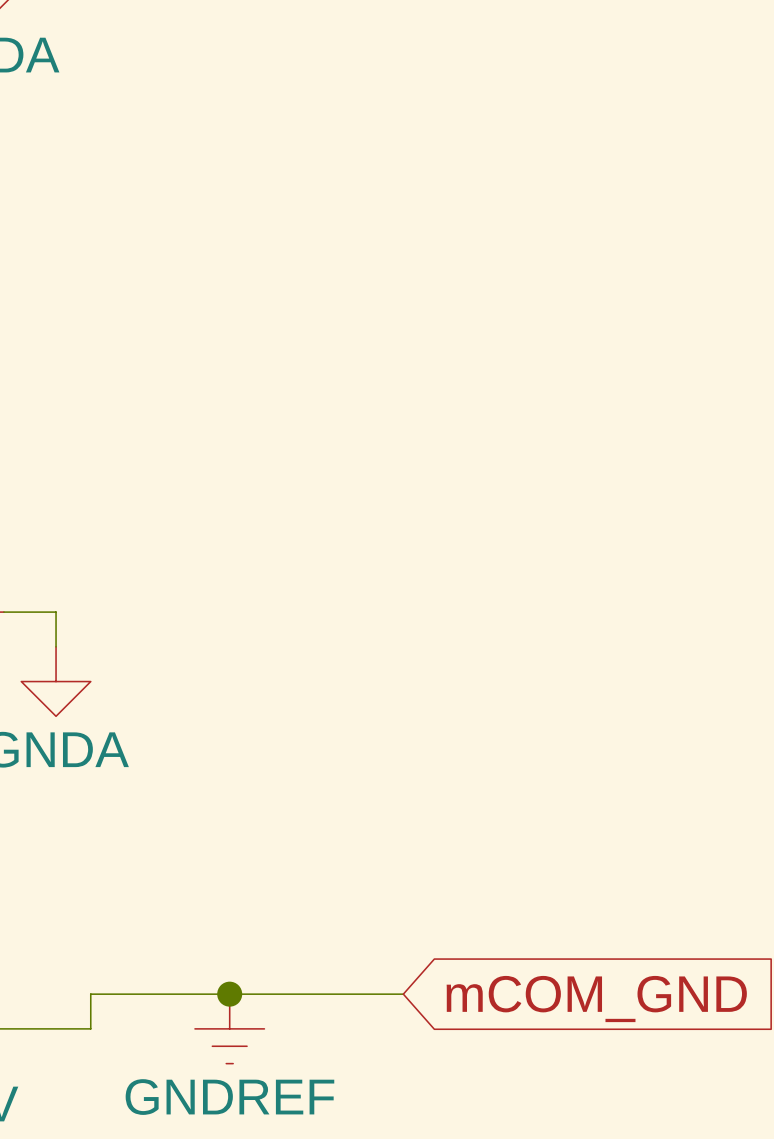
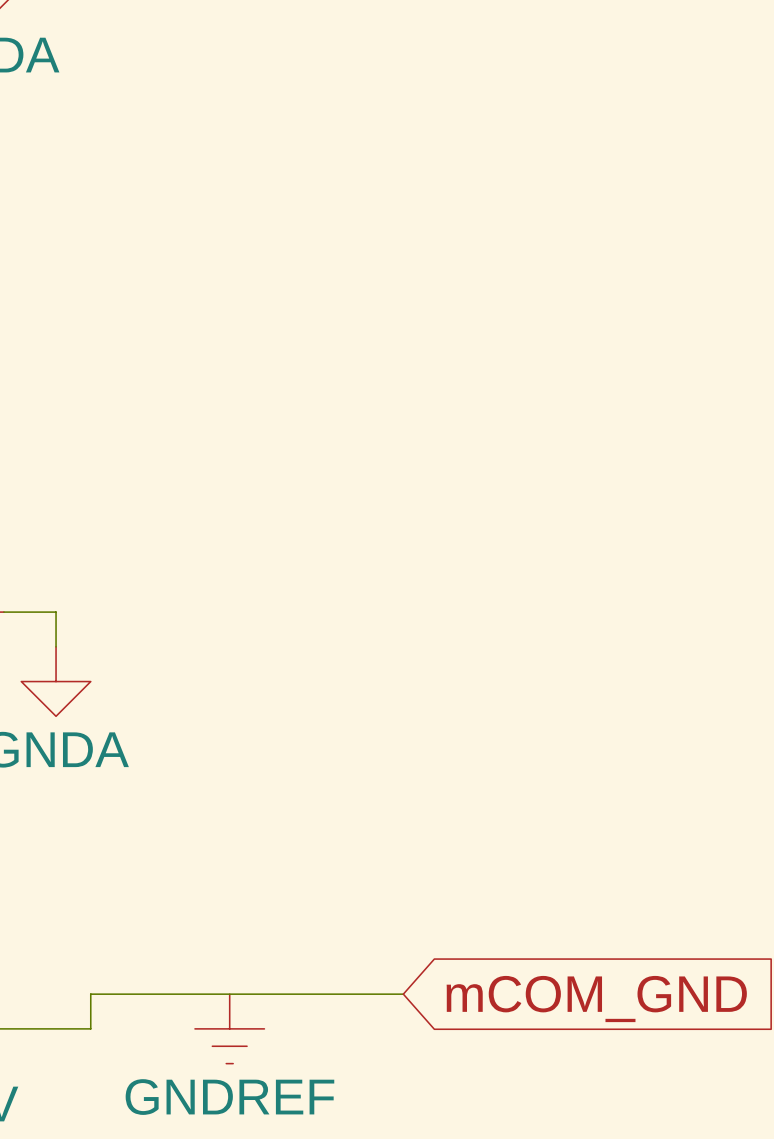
junction: (229, 994) -> none

